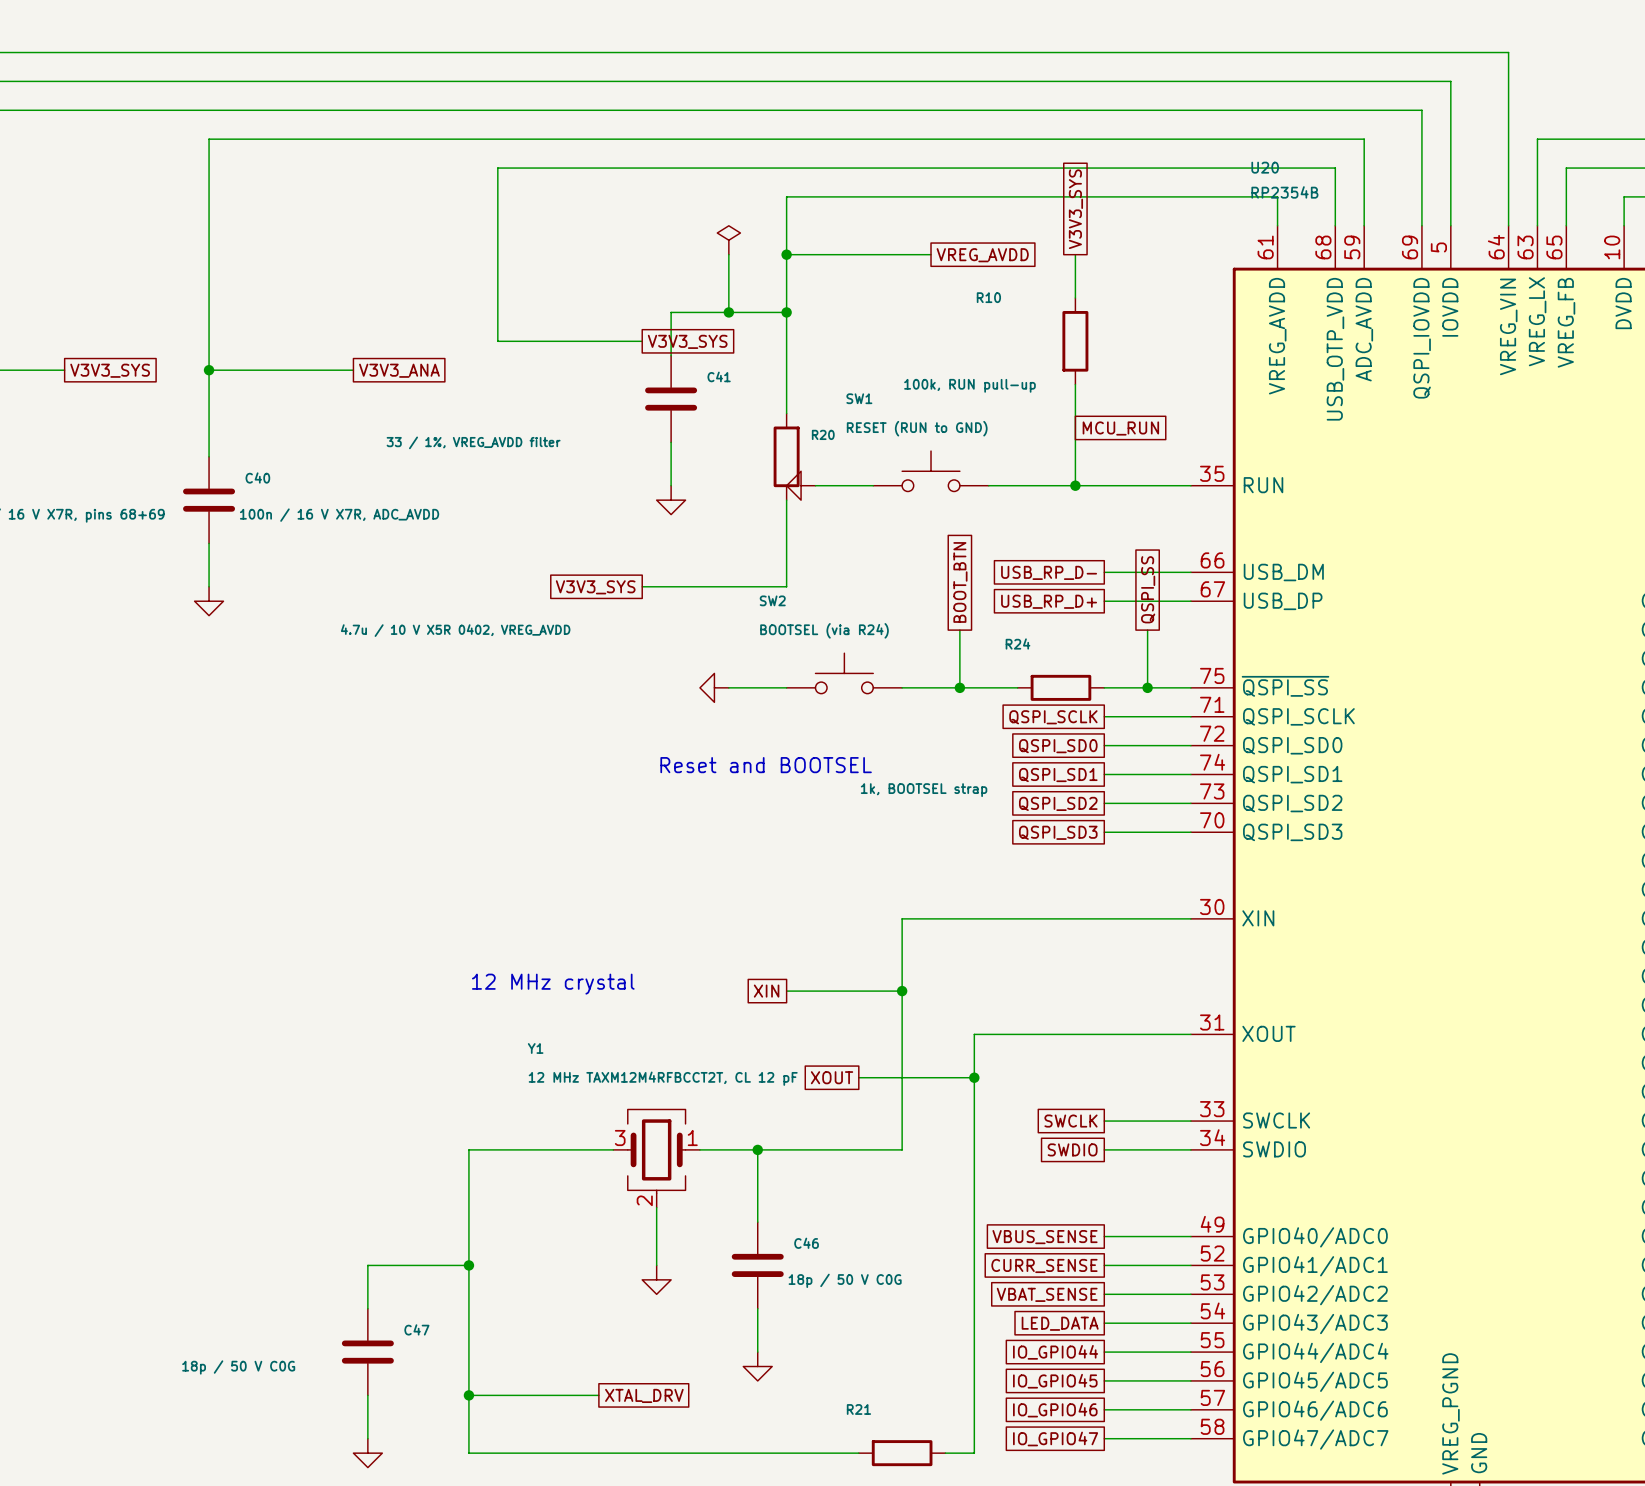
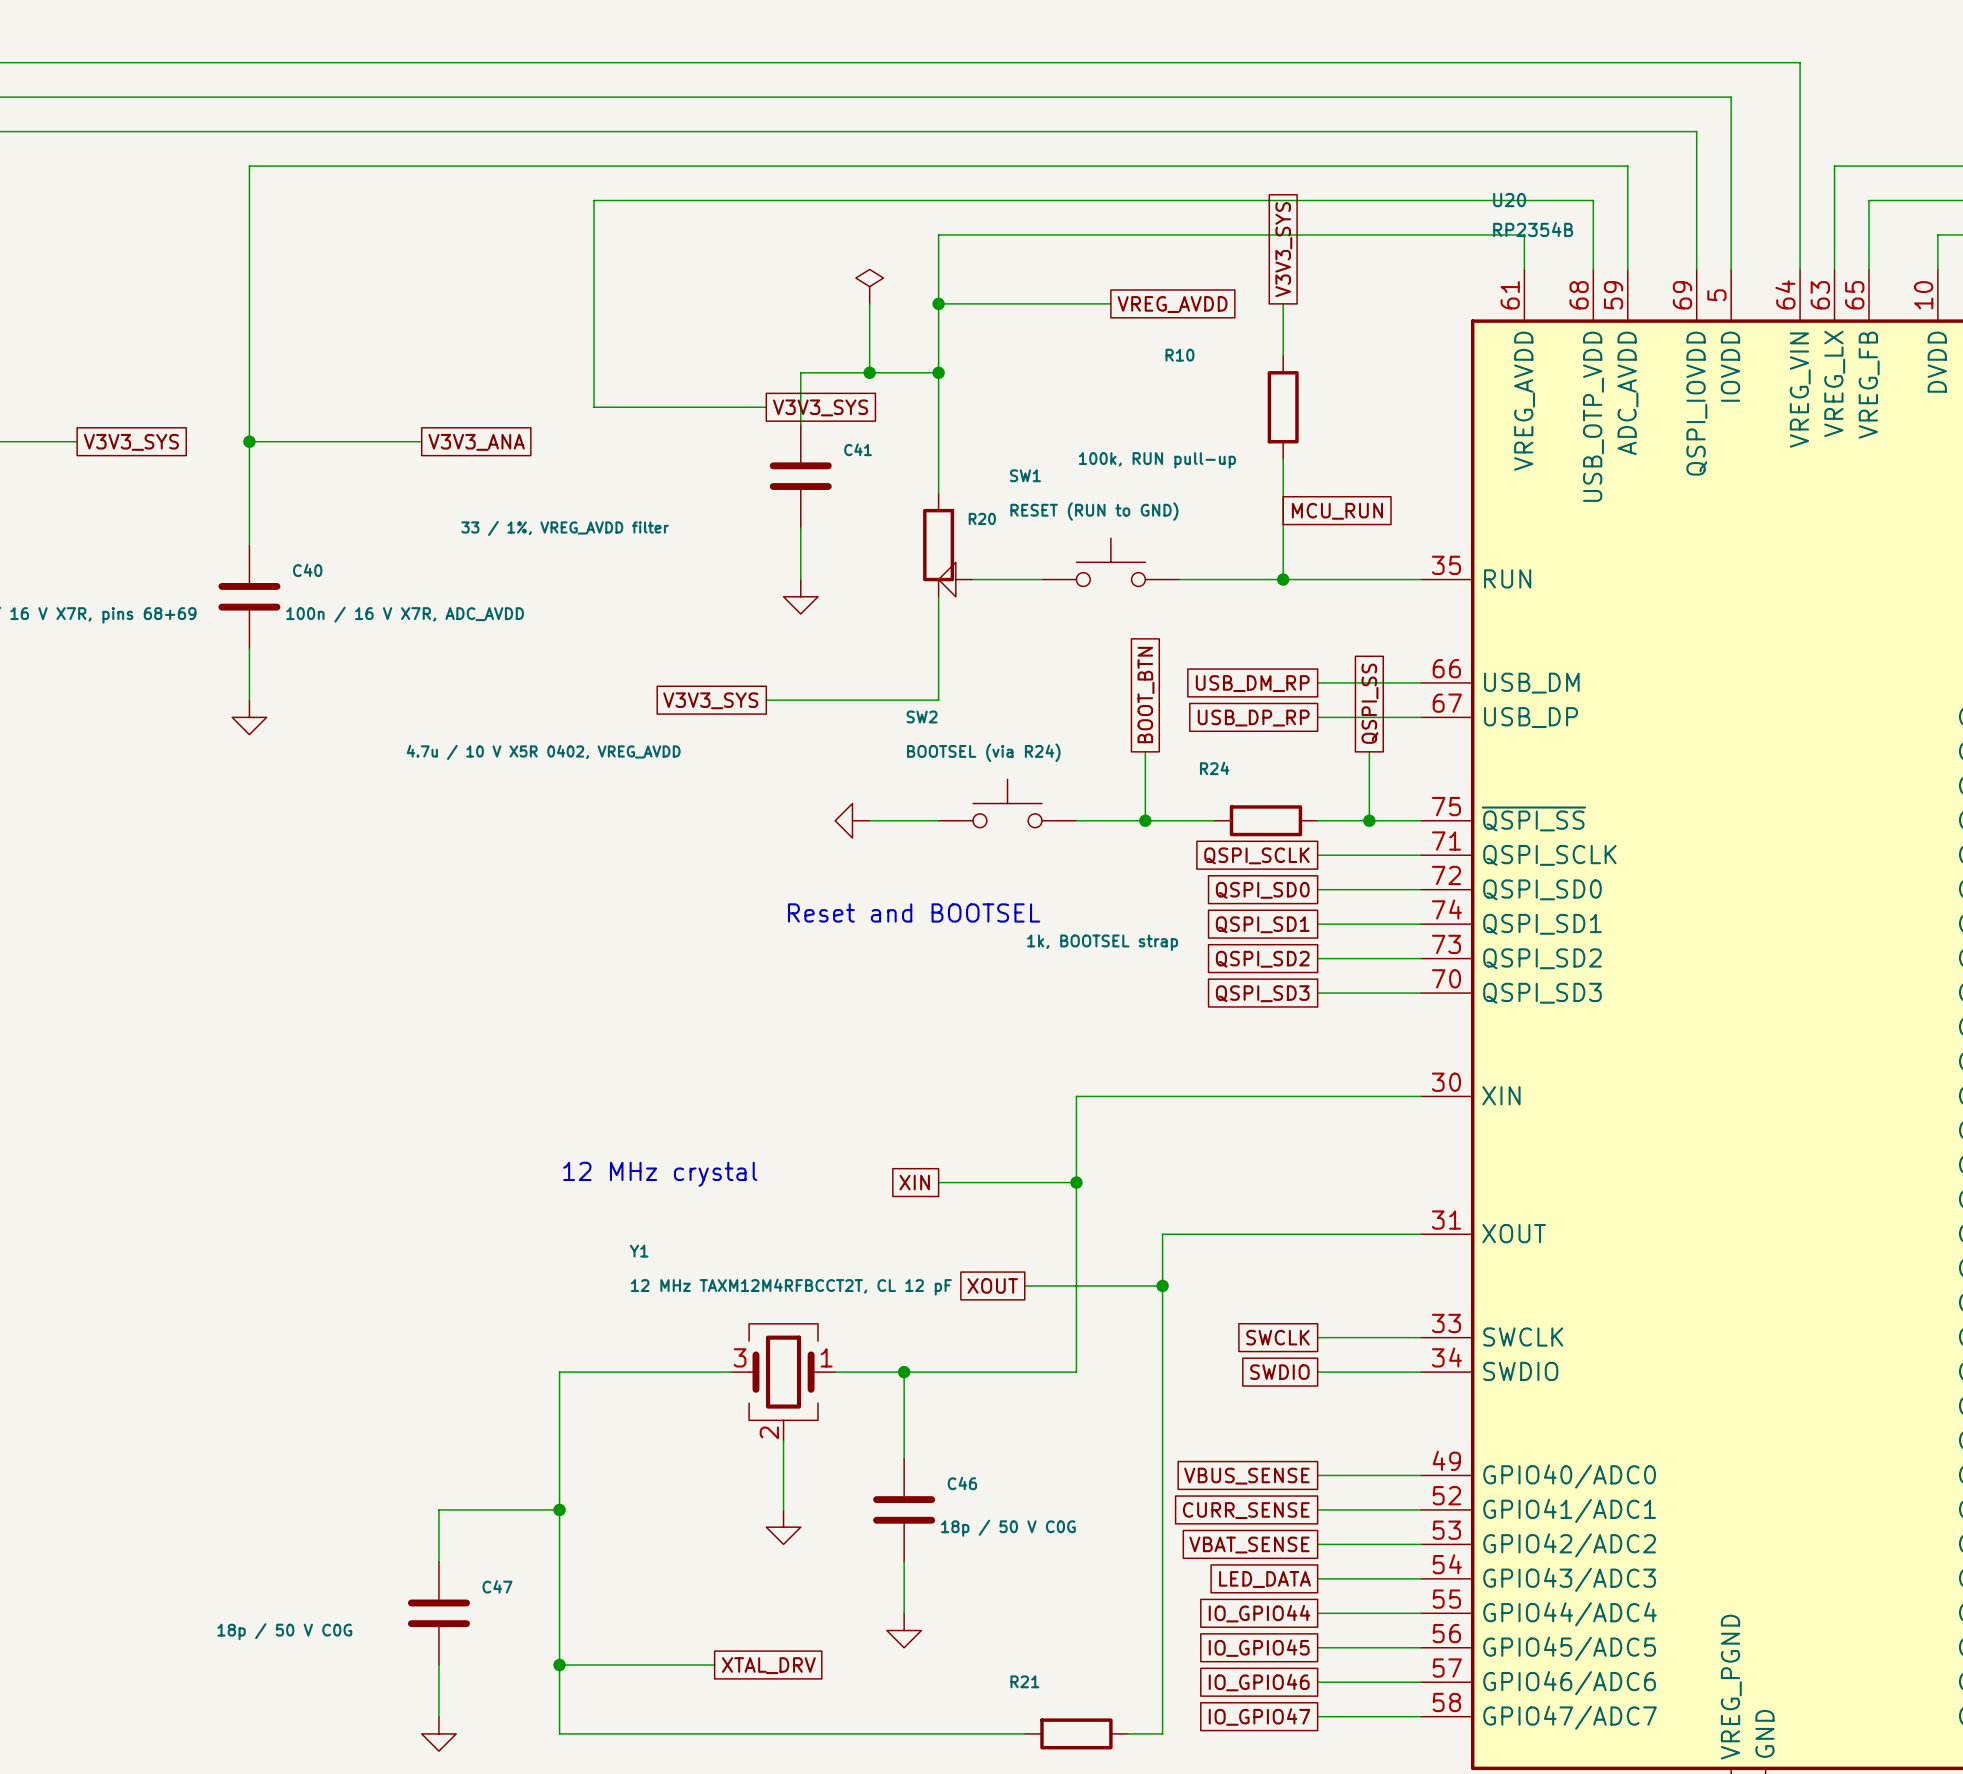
global label: USB_RP_D- (1049, 572) -> USB_DM_RP (1252, 683)
global label: USB_RP_D+ (1049, 601) -> USB_DP_RP (1253, 718)

